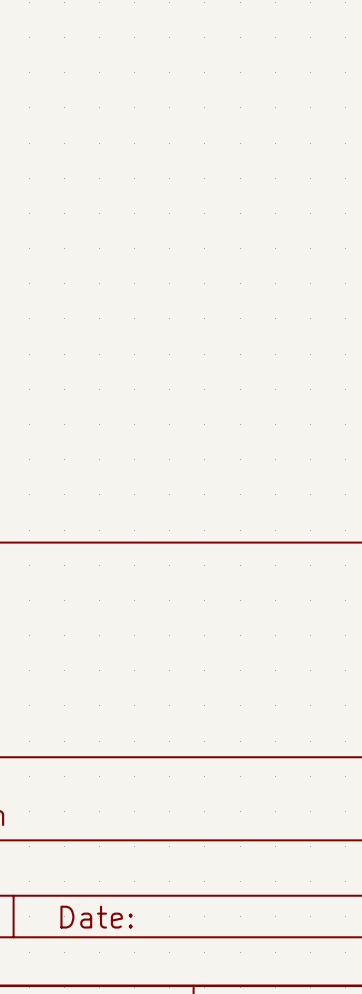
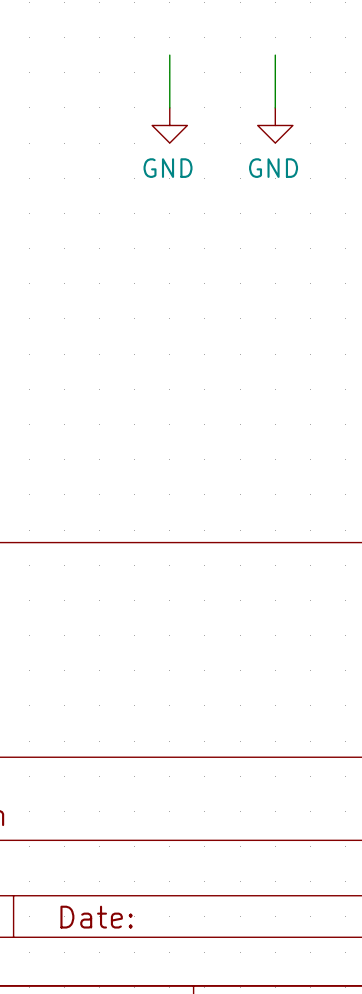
wire: none -> (169, 55) (169, 107)
wire: none -> (275, 55) (275, 107)
power symbol: none -> GND (169, 125)
power symbol: none -> GND (275, 125)

